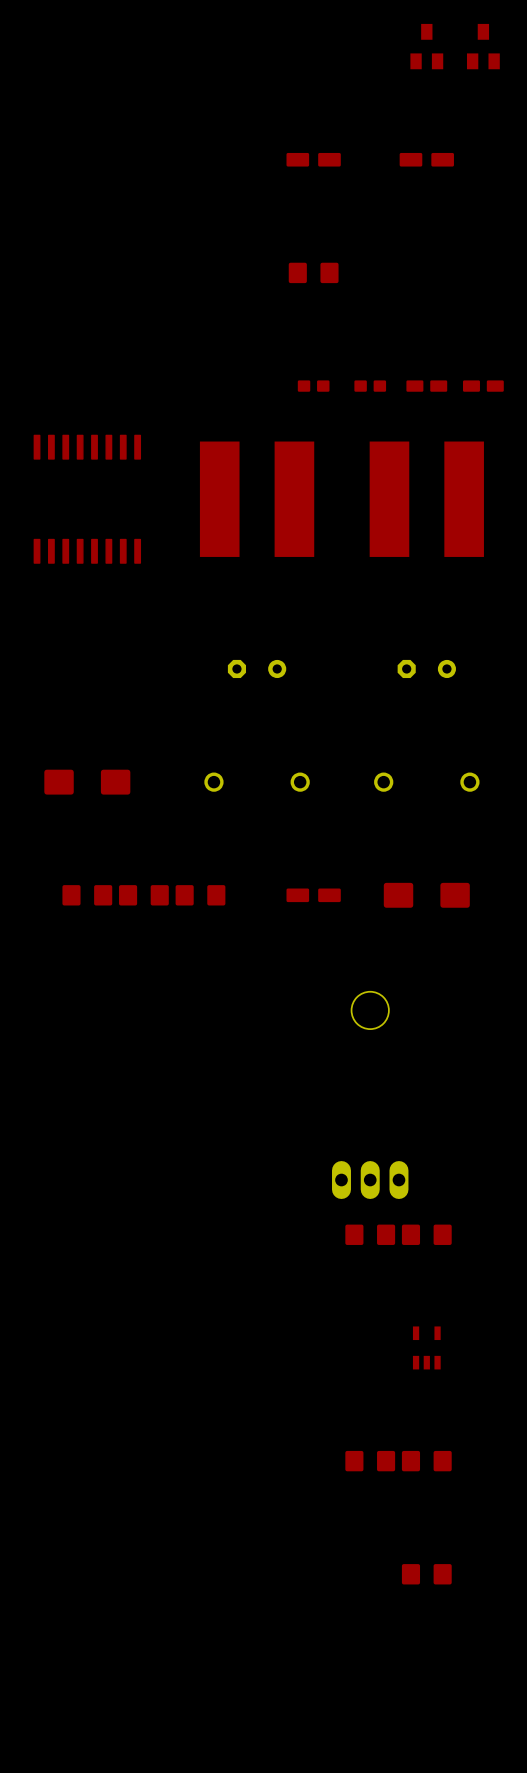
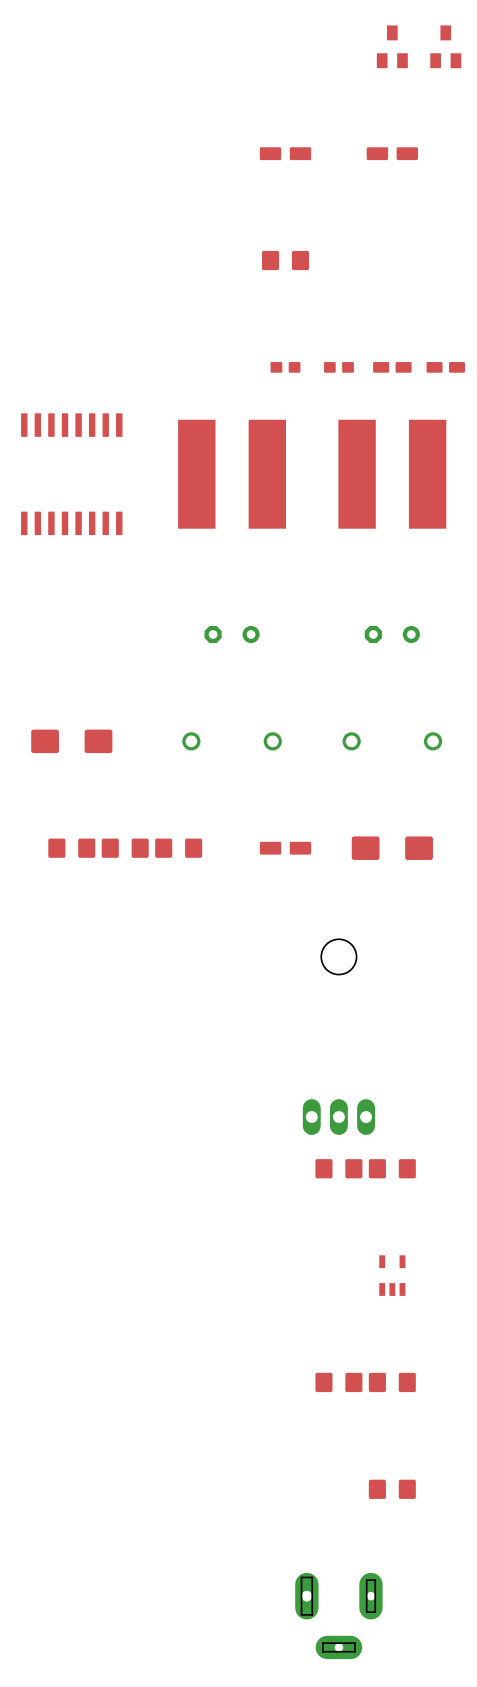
part: none -> (338, 1615)

